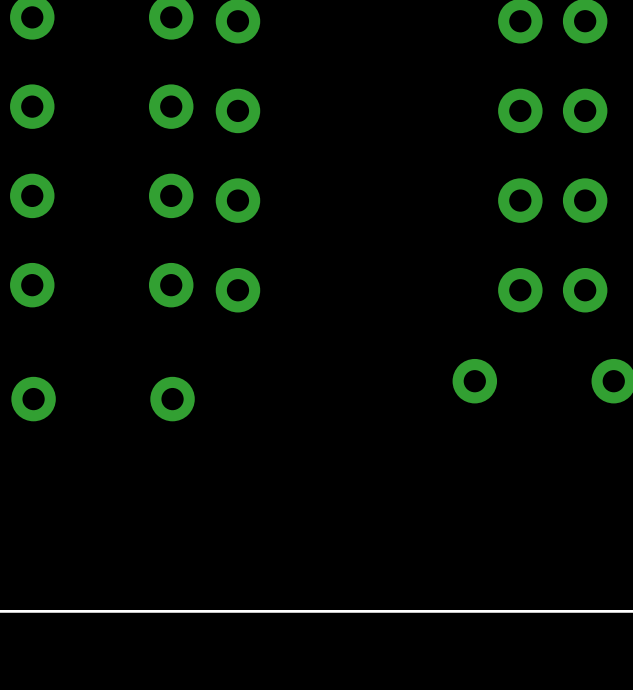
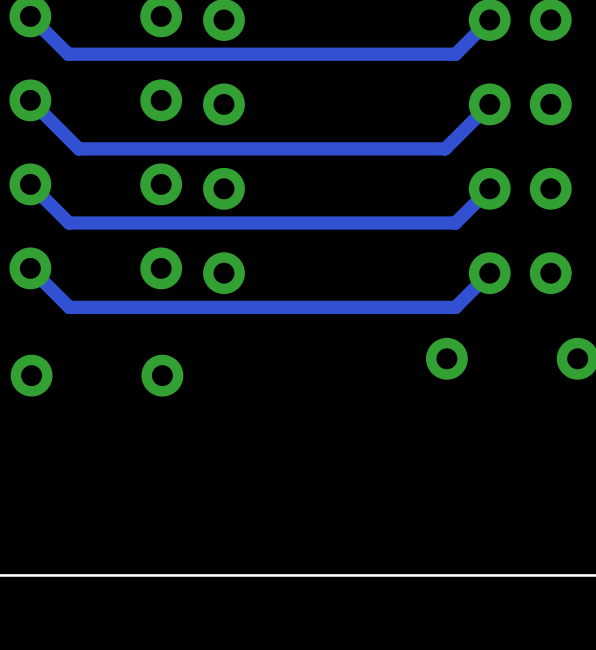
track: none -> (30, 16) (68, 54) (455, 54) (489, 20)
track: none -> (30, 100) (78, 148) (445, 148) (489, 104)
track: none -> (30, 184) (68, 222) (455, 222) (489, 188)
track: none -> (30, 268) (69, 307) (455, 307) (489, 273)

